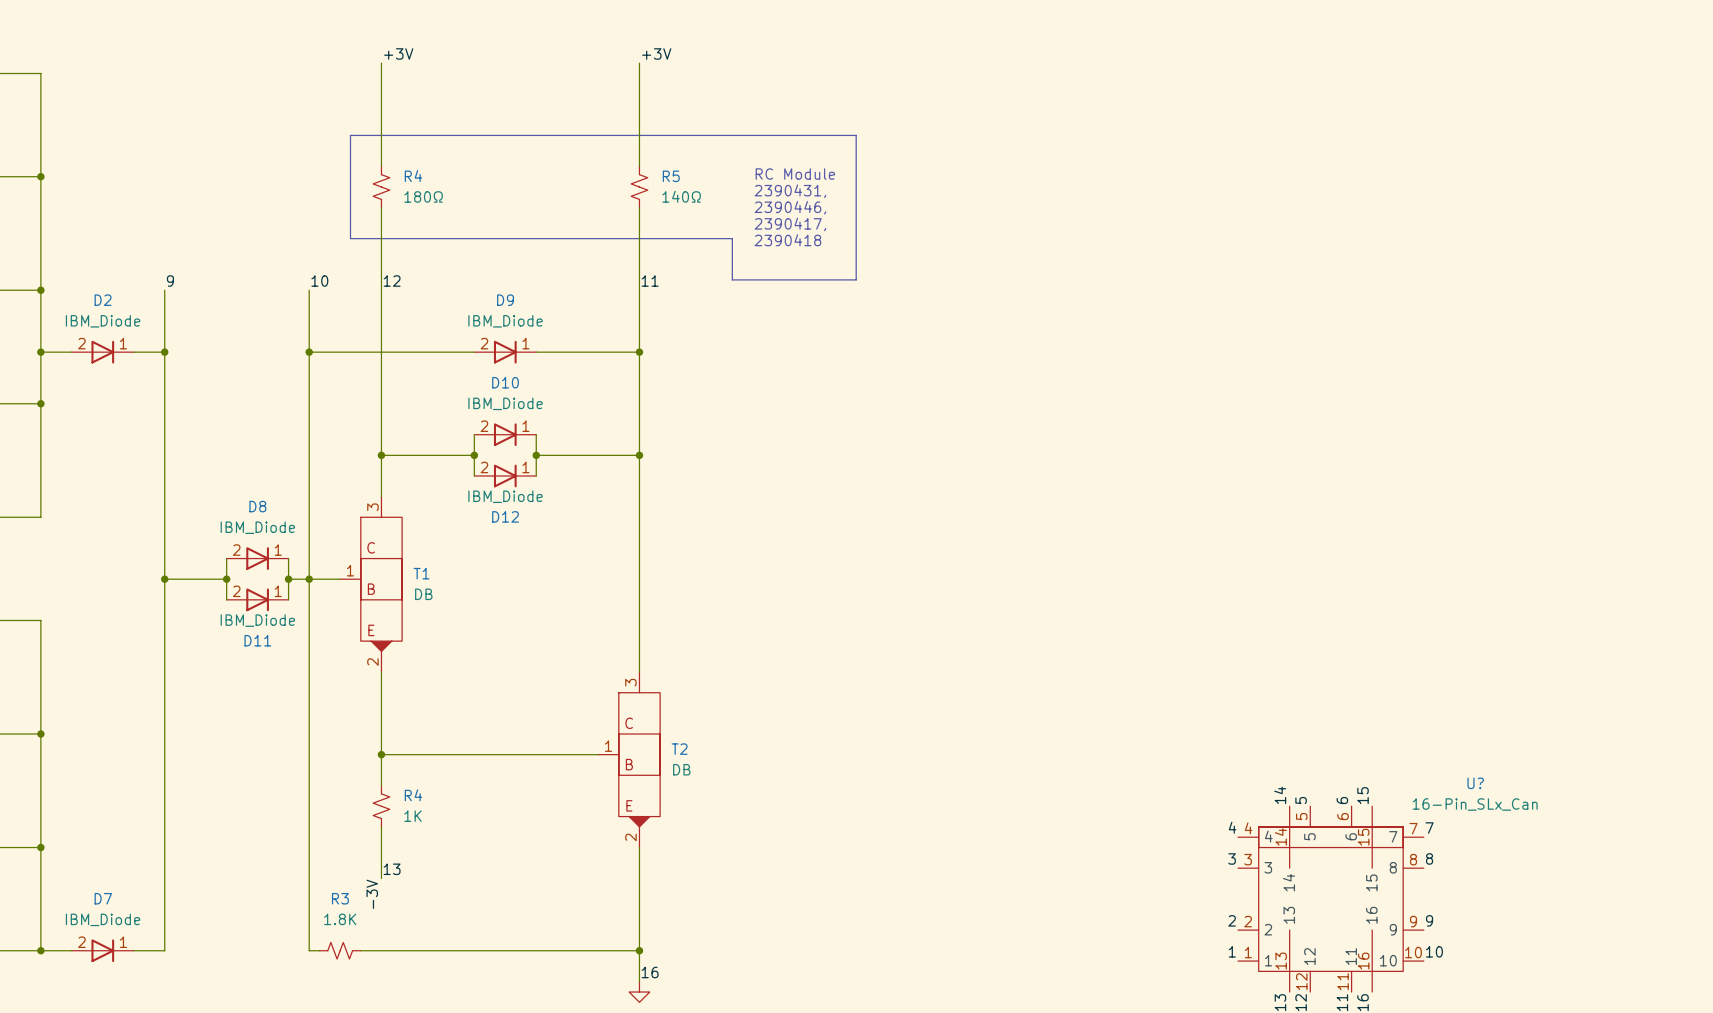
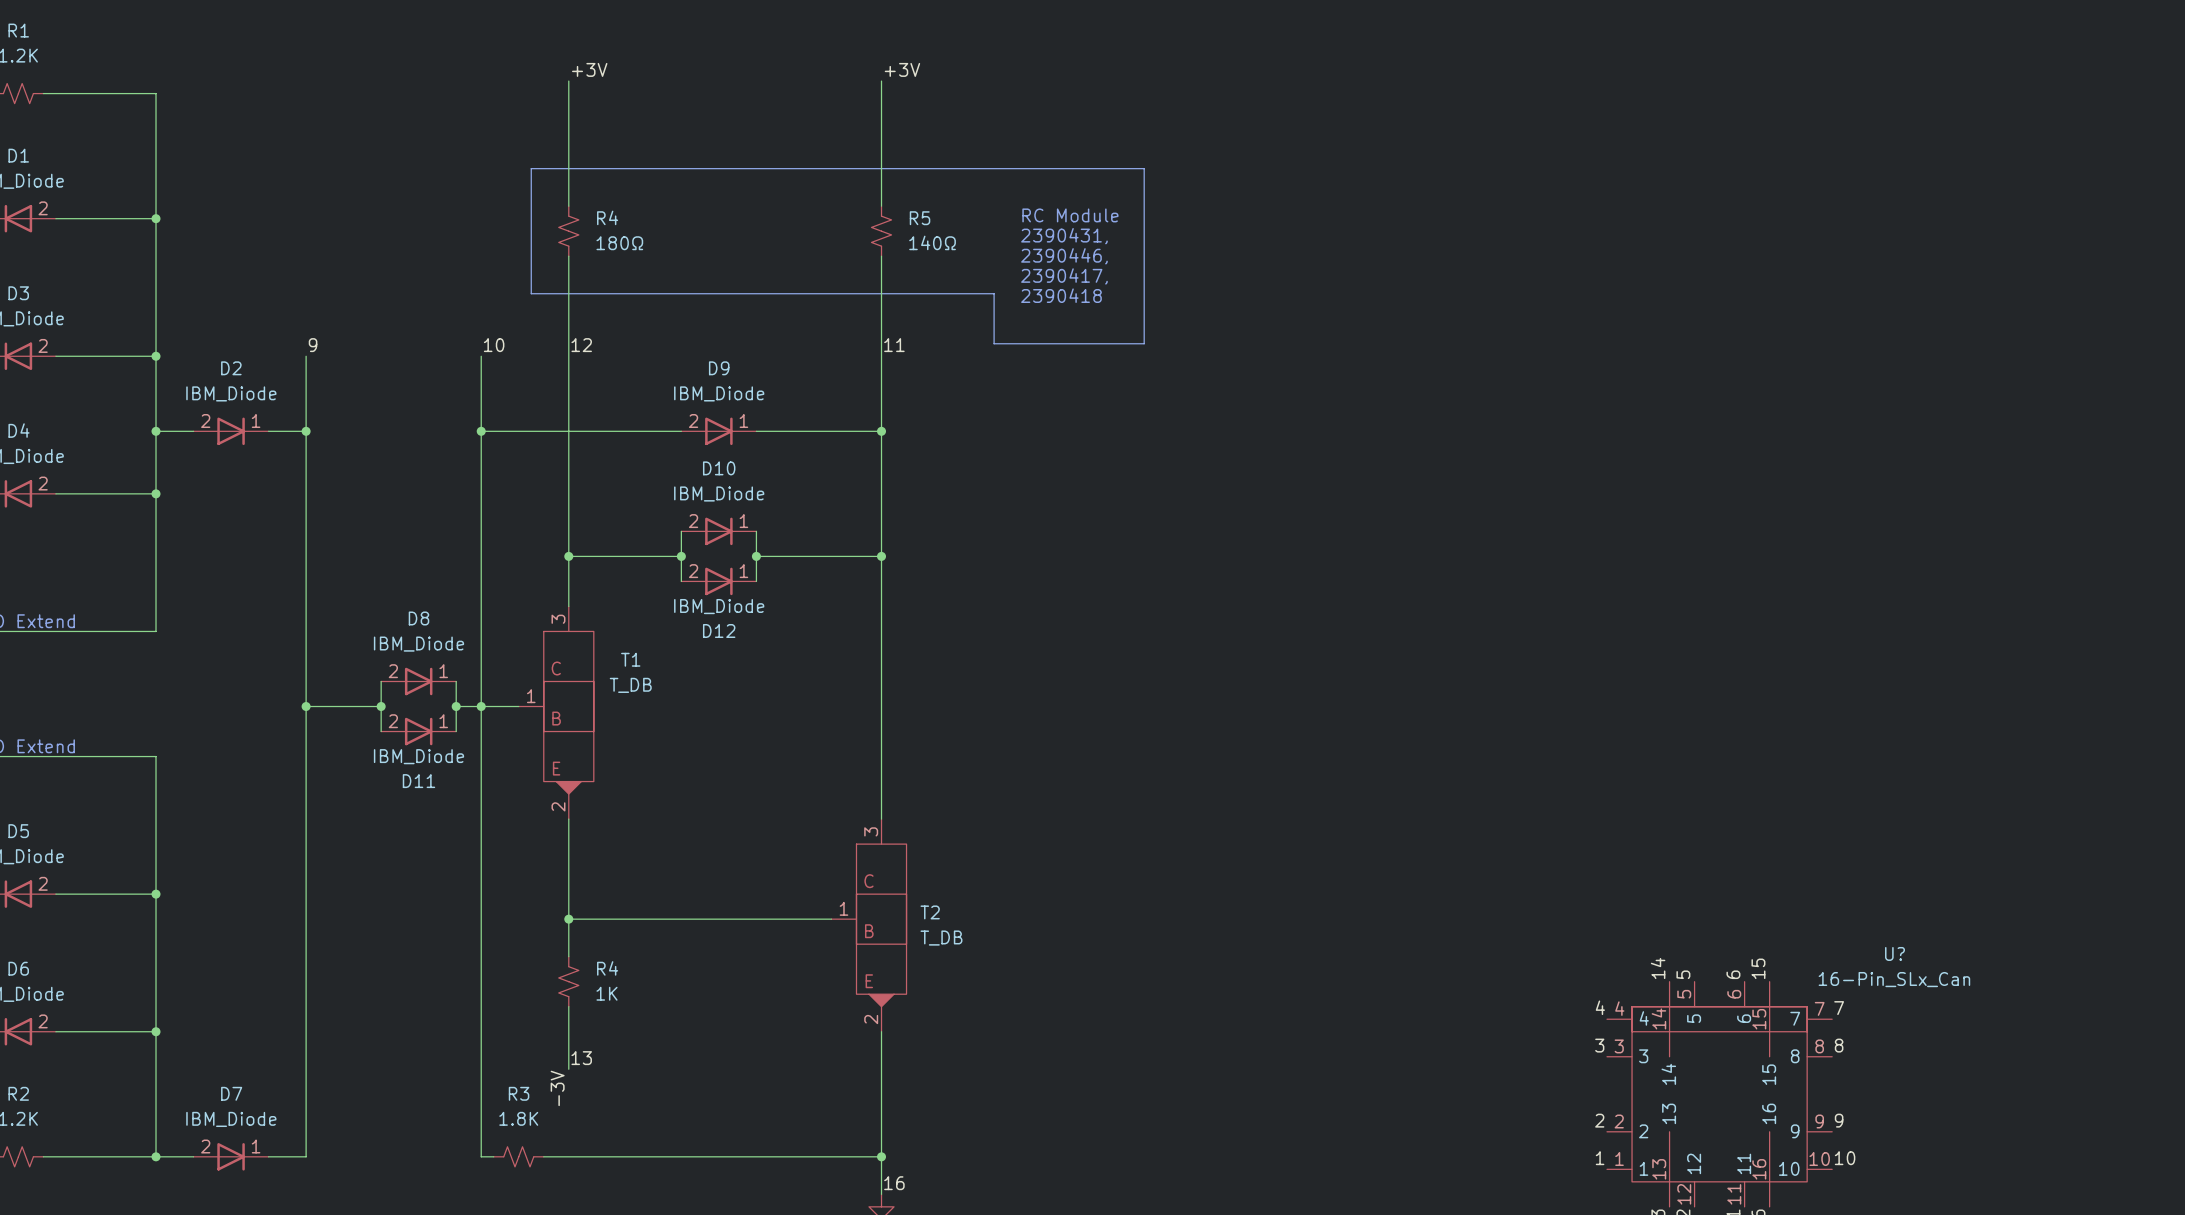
T1 name position: T1 (421, 573) -> T1 (630, 659)
T1 value: DB (423, 594) -> T_DB (630, 685)
T2 value: DB (681, 769) -> T_DB (941, 938)

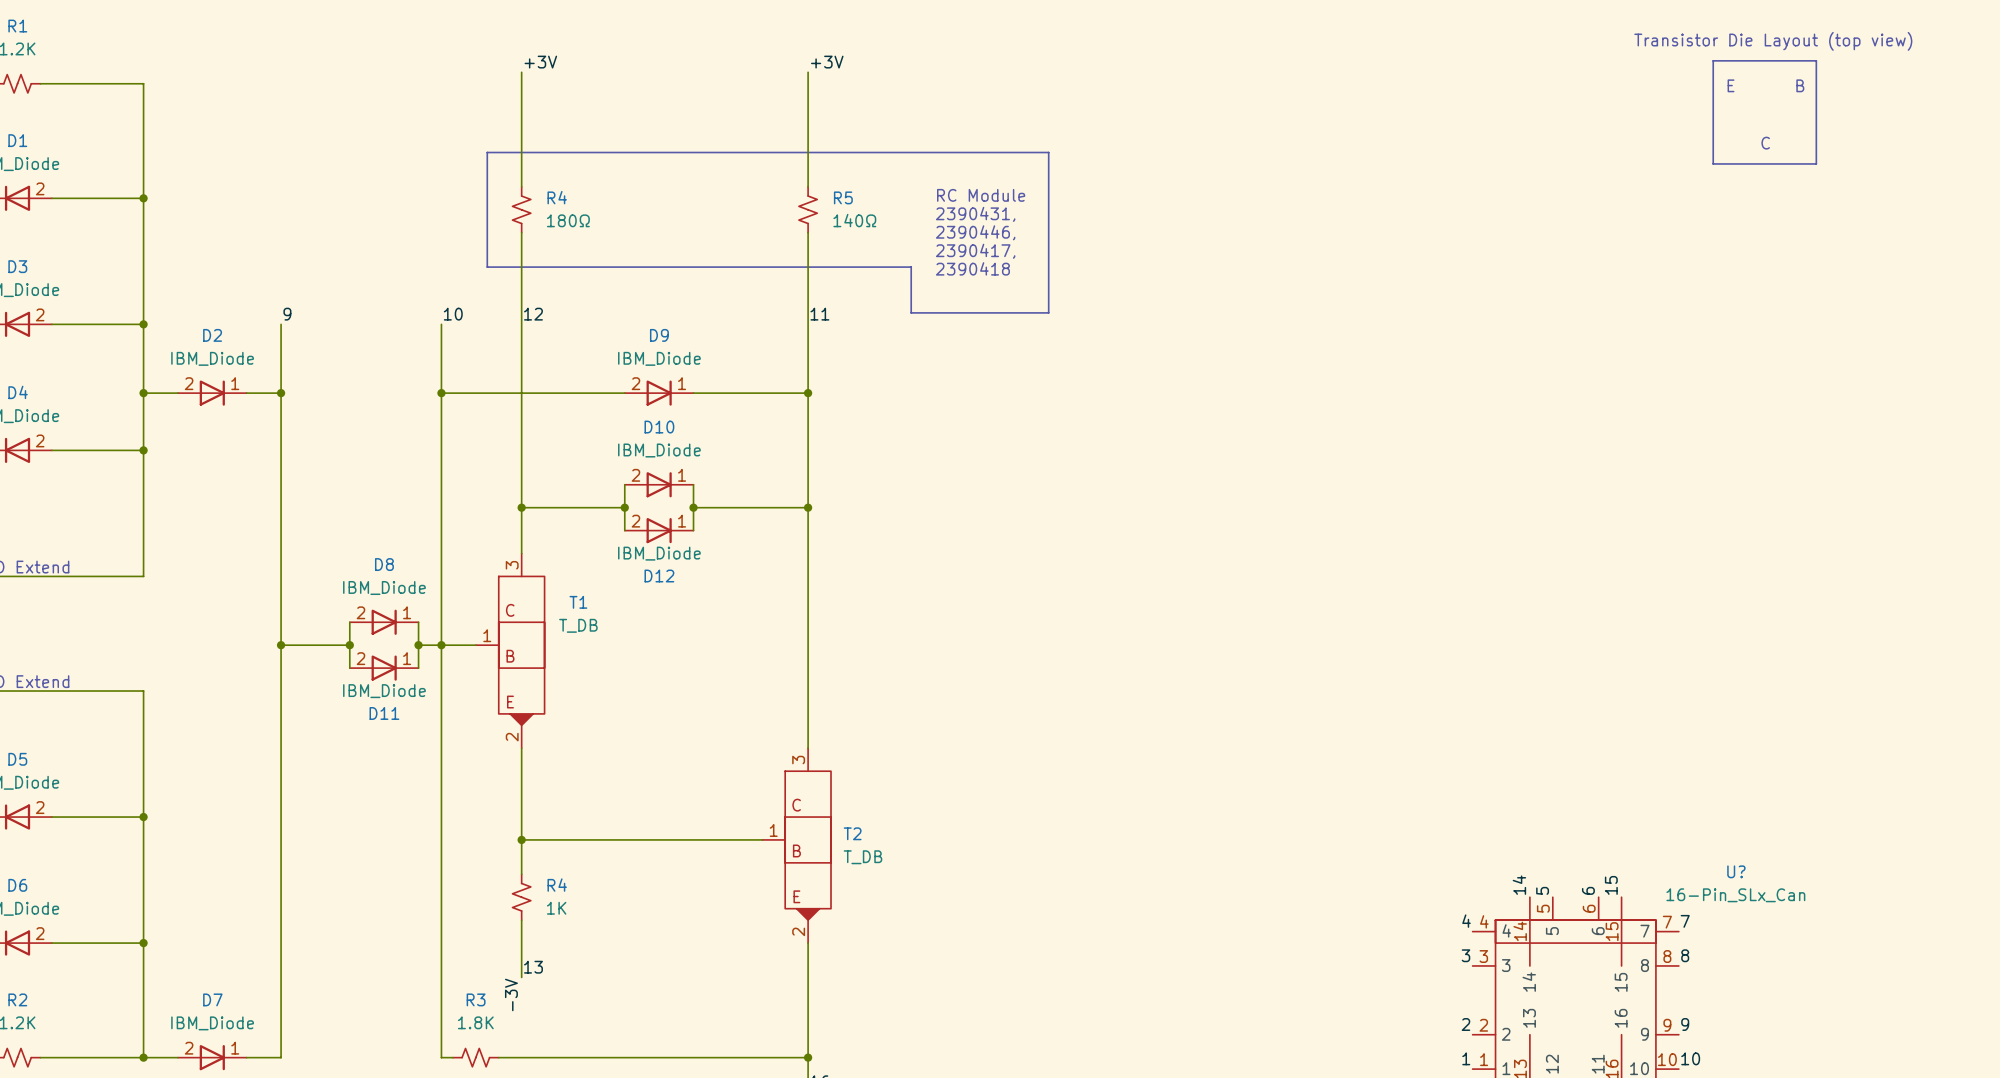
text: none -> Transistor Die Layout (top view) (1773, 41)
line: none -> (1713, 60) (1713, 163) (1816, 163) (1816, 60) (1713, 60)
text: none -> E (1731, 85)
text: none -> B (1800, 85)
text: none -> C (1765, 143)

